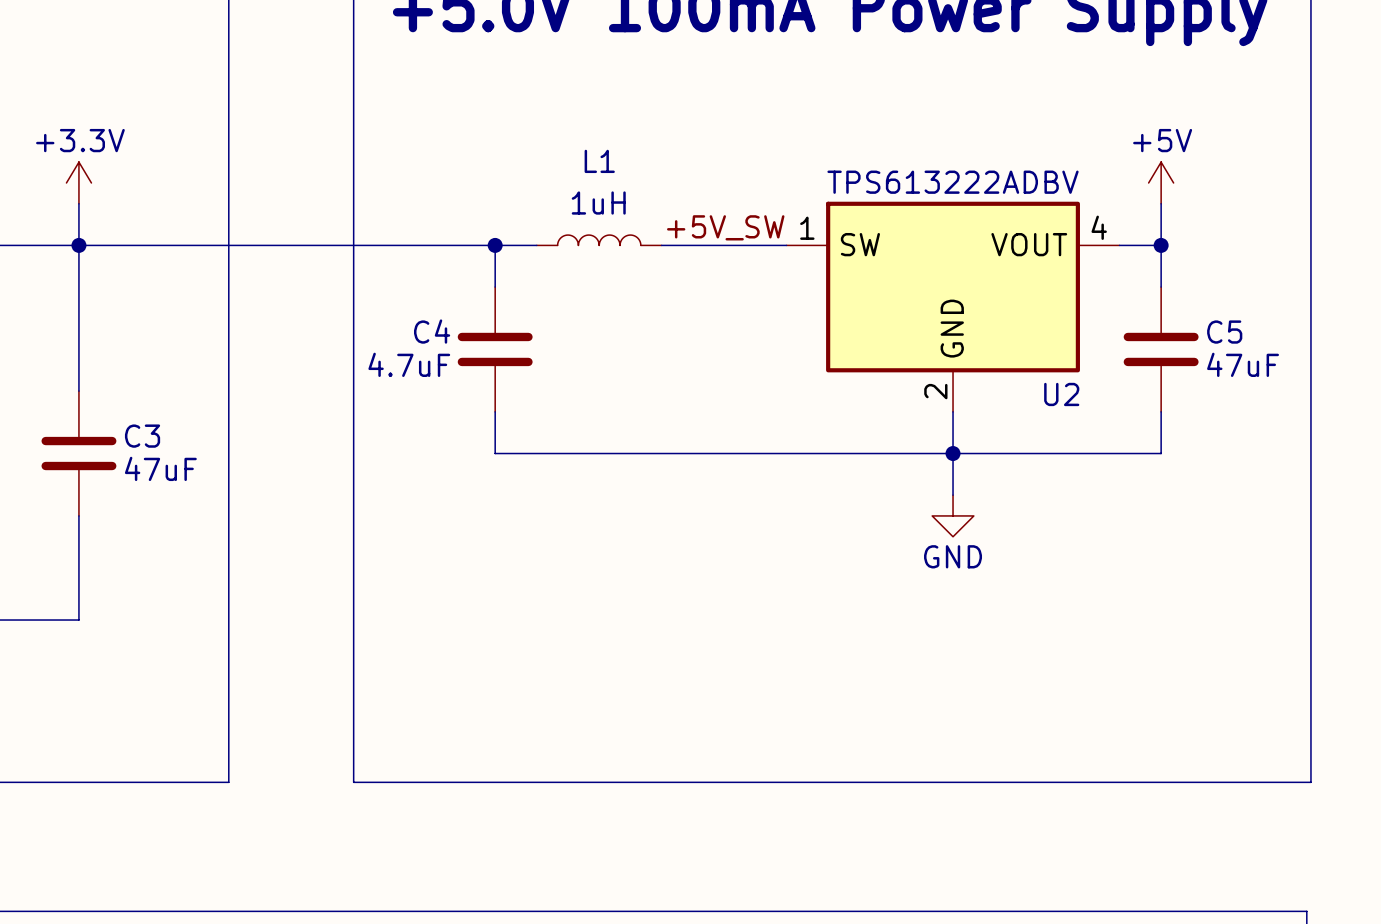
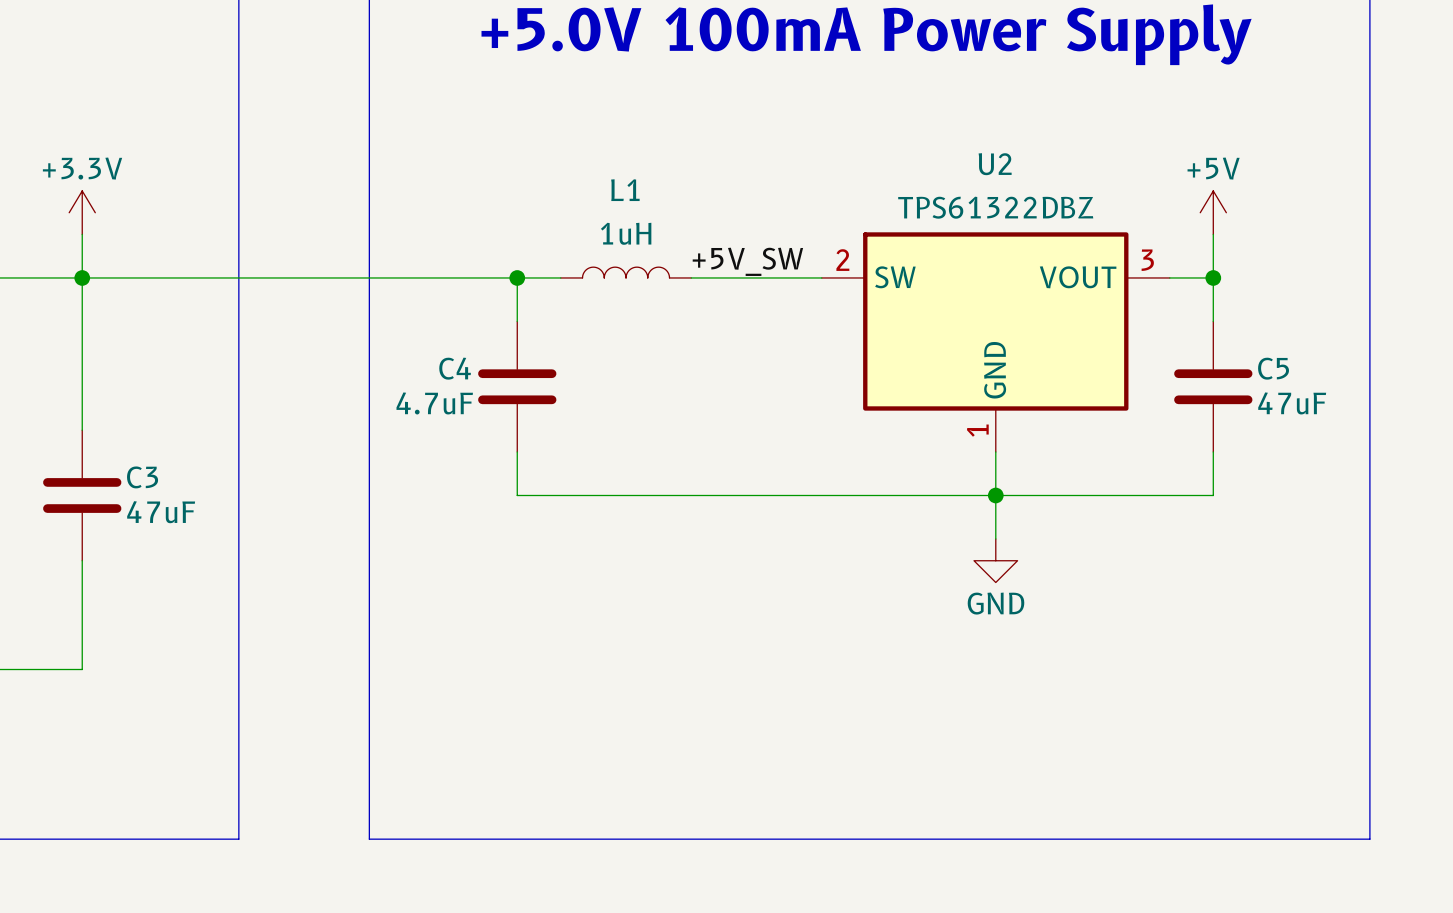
U2 value: TPS613222ADBV (953, 182) -> TPS61322DBZ (995, 207)
U2 pin number: 4 (1099, 227) -> 3 (1147, 260)
U2 pin number: 1 (807, 228) -> 2 (842, 260)
U2 pin number: 2 (935, 391) -> 1 (977, 430)
U2 name position: U2 (1061, 394) -> U2 (995, 164)

